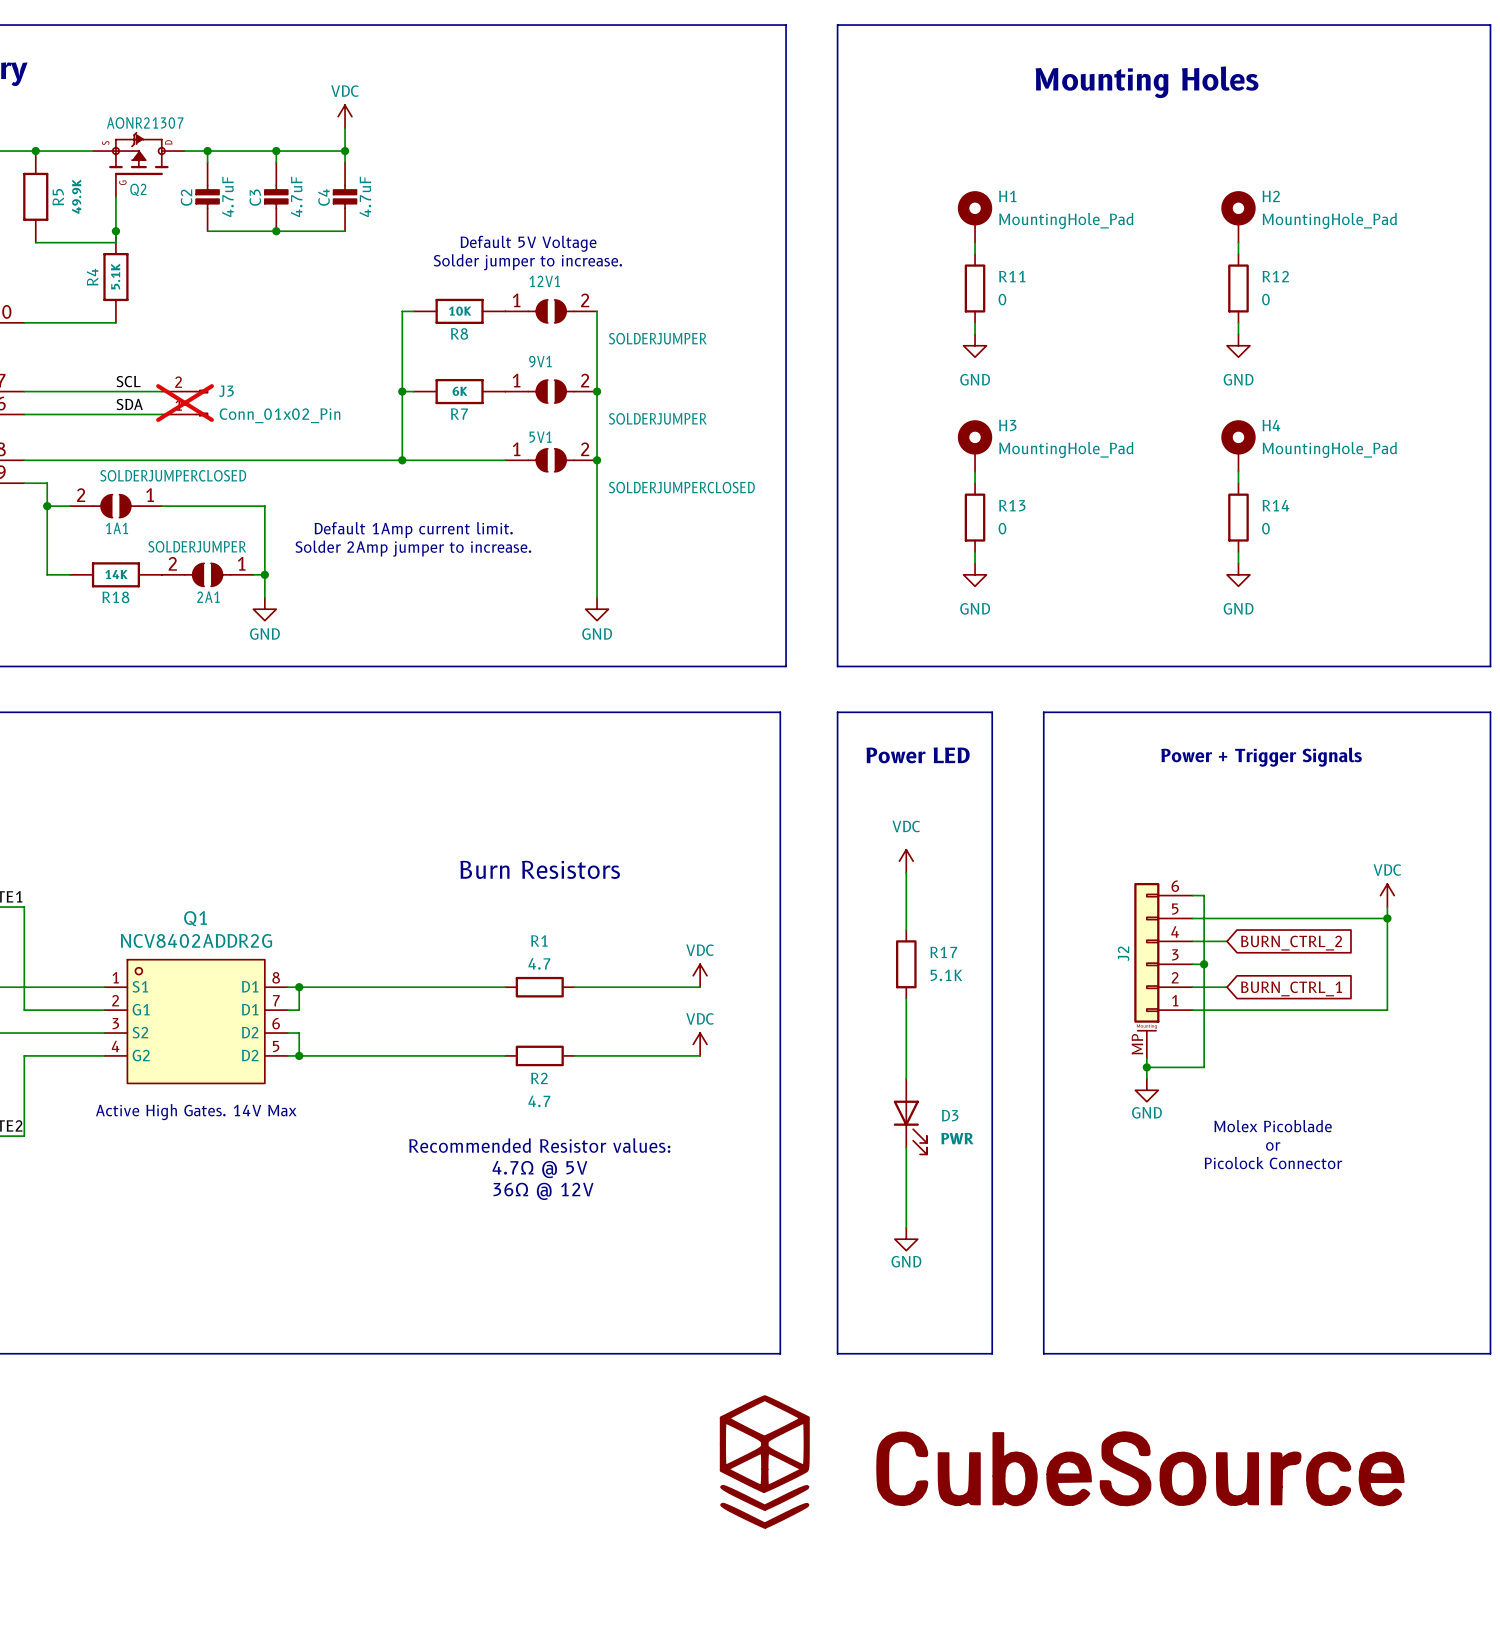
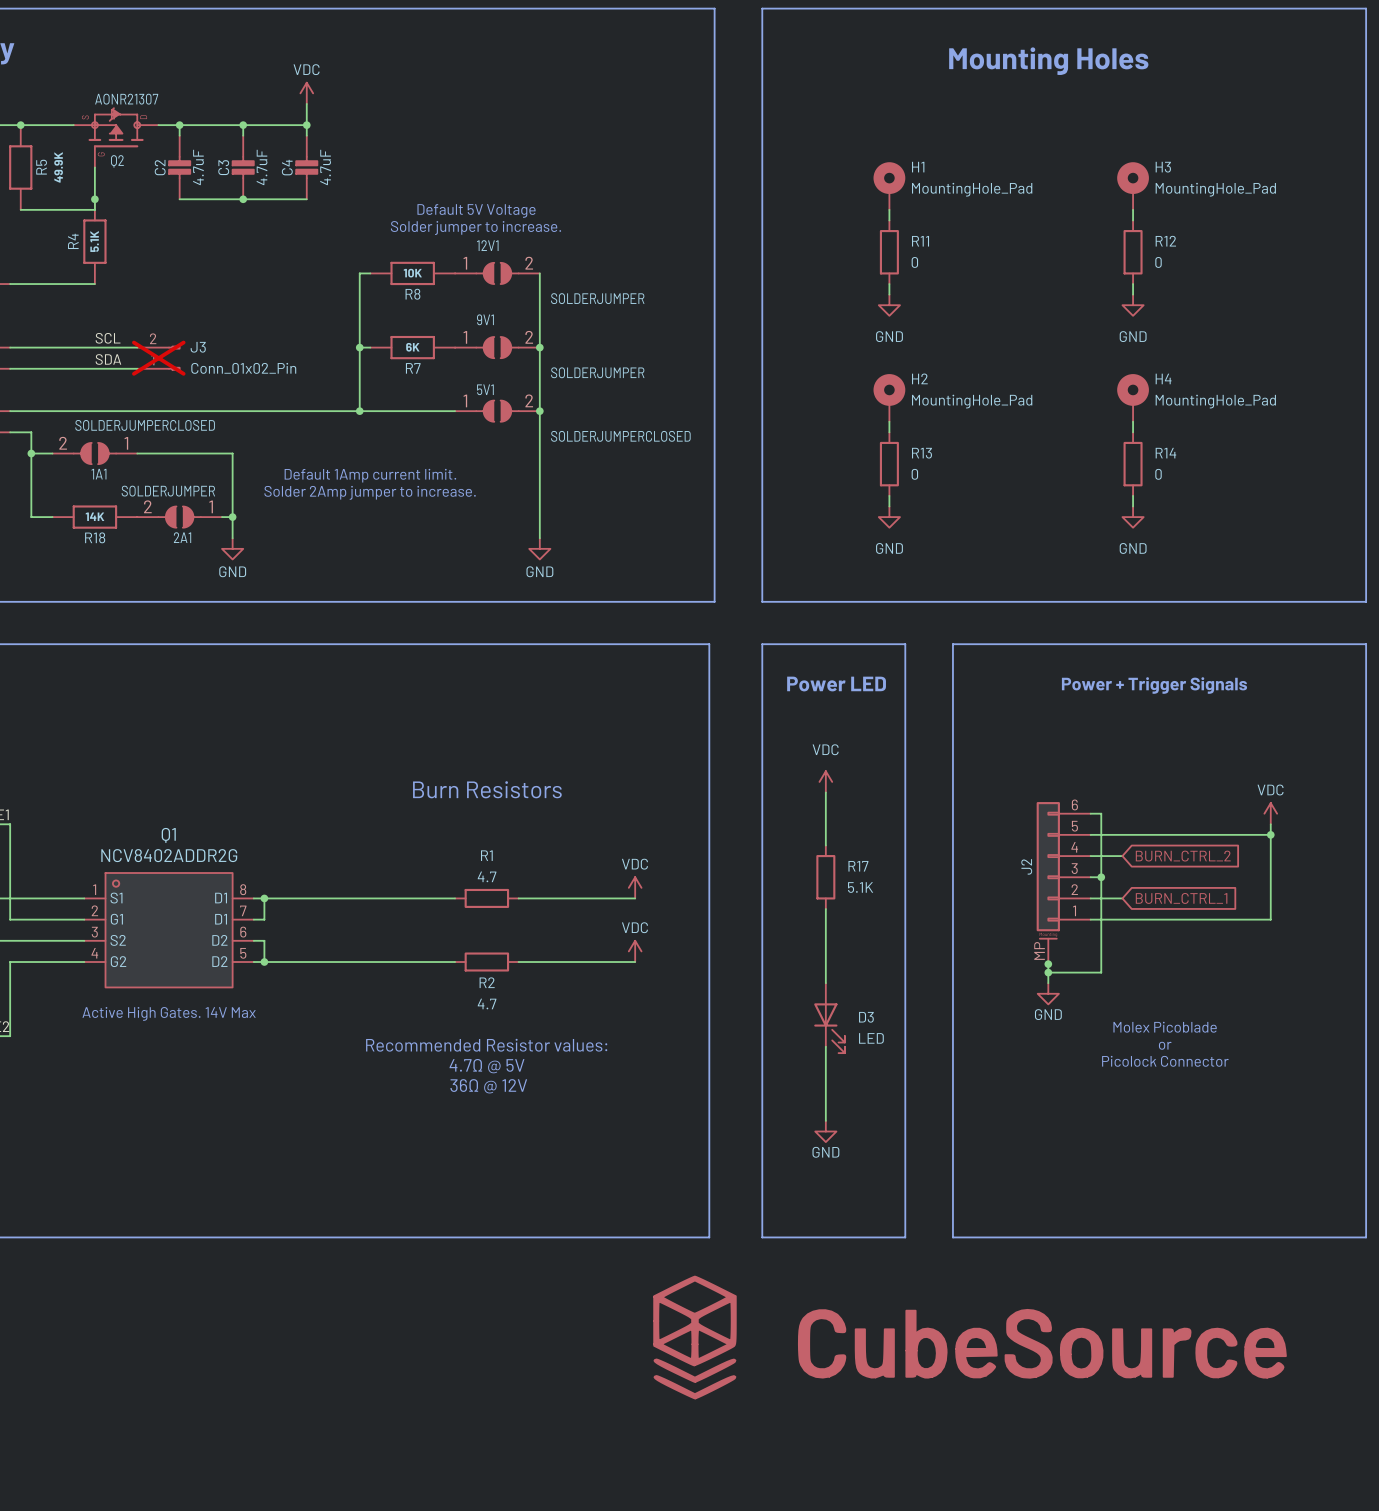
H2 name: H2 (1271, 196) -> H3 (1163, 167)
H3 name: H3 (1007, 425) -> H2 (919, 378)
junction: none -> (1048, 964)
D3 value: PWR (957, 1138) -> LED (871, 1038)

